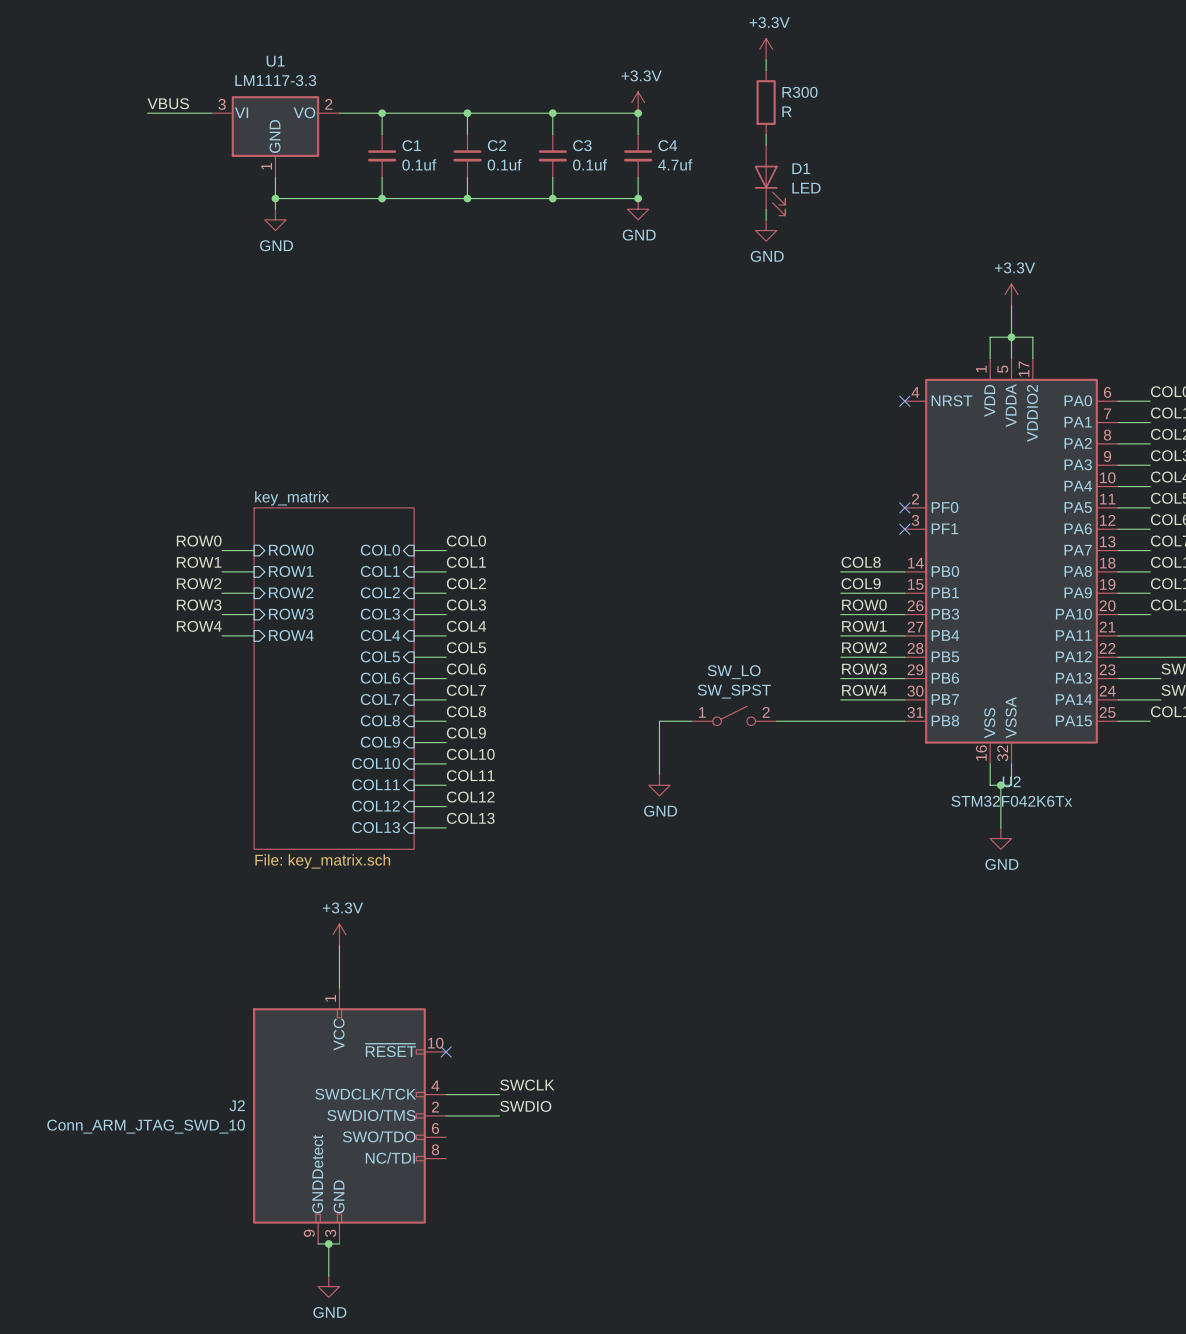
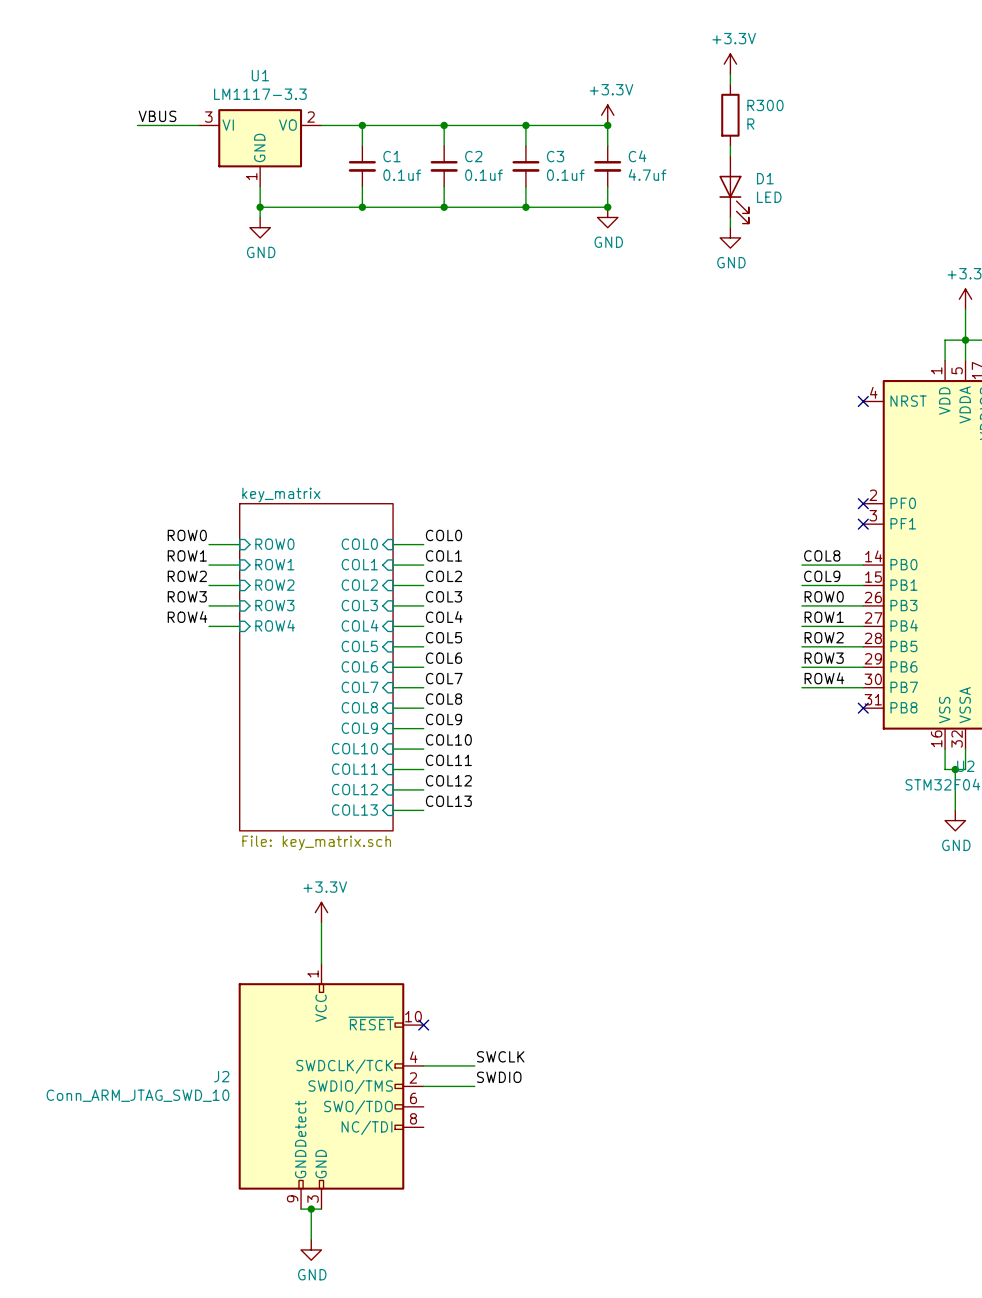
SW_LO: SW_SPST (734, 715) -> none
wire: (691, 721) (659, 721) (659, 774) -> none
wire: (776, 721) (904, 721) -> none
no-connect mark: none -> (863, 708)
power symbol: GND (659, 785) -> none

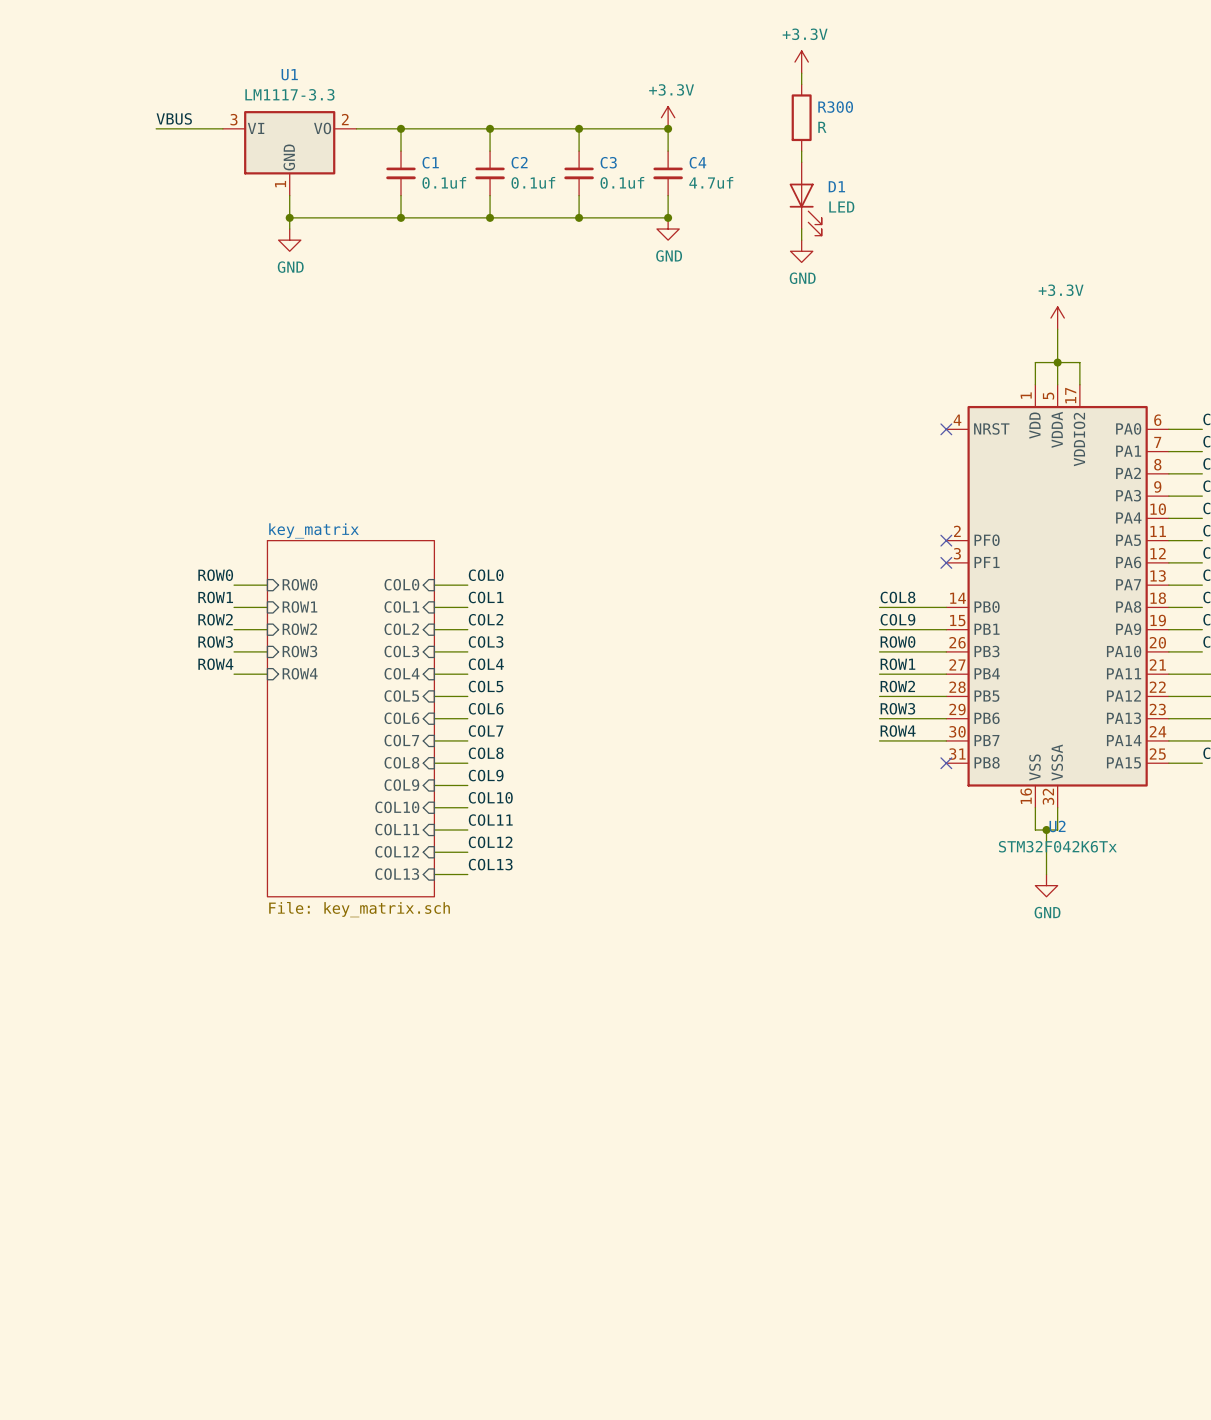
power symbol: +3.3V (321, 912) -> none
wire: (321, 922) (321, 963) -> none
no-connect mark: (423, 1025) -> none
label: SWCLK (500, 1056) -> none
wire: (423, 1065) (474, 1065) -> none
label: SWDIO (499, 1077) -> none
J2: Conn_ARM_JTAG_SWD_10 (331, 1086) -> none
wire: (423, 1086) (474, 1086) -> none
wire: (301, 1209) (321, 1209) -> none
wire: (311, 1209) (311, 1239) -> none
junction: (311, 1209) -> none
power symbol: GND (311, 1249) -> none

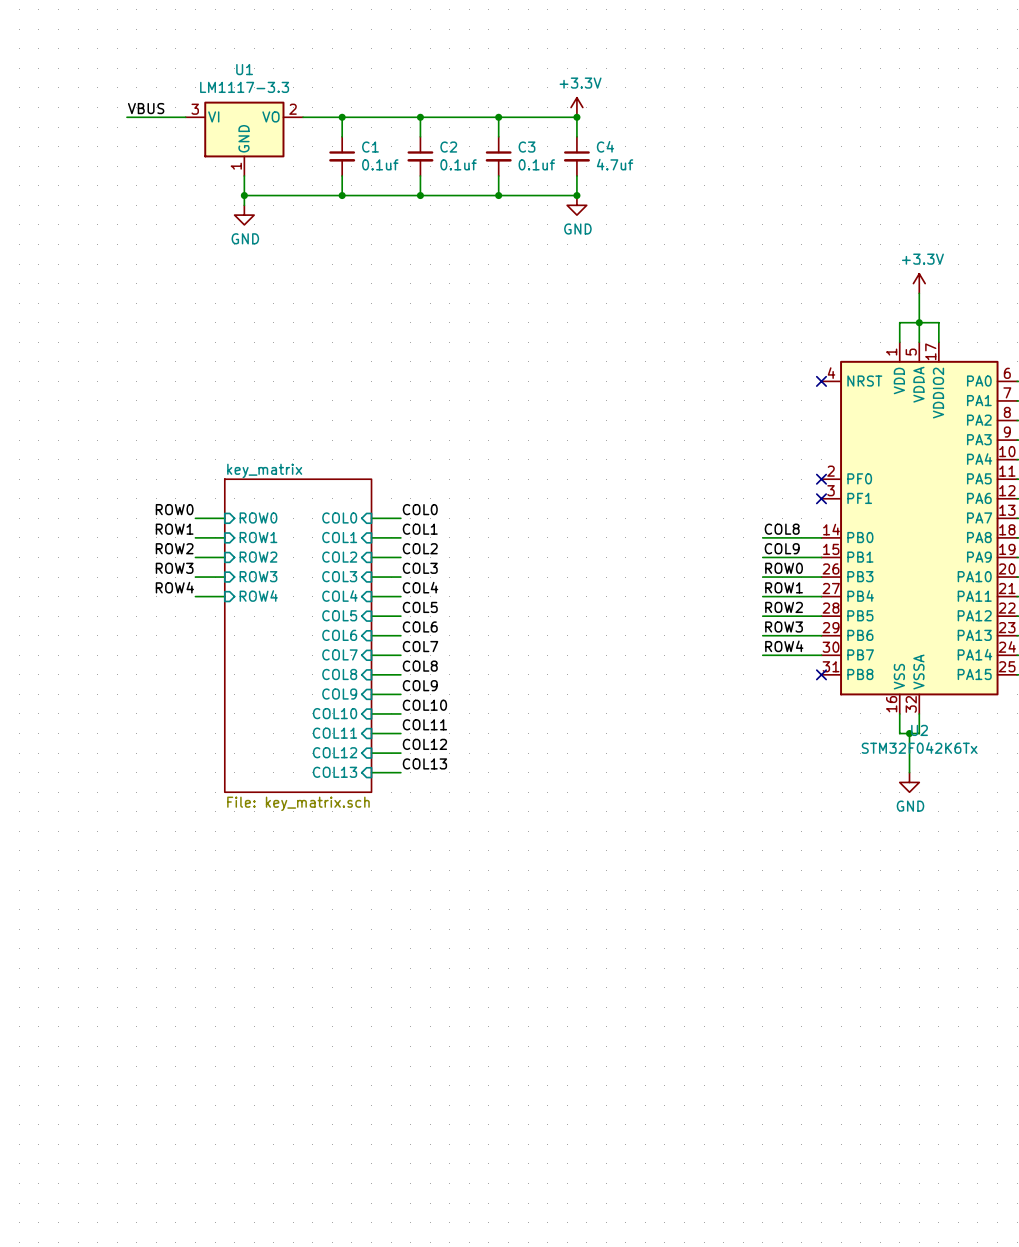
power symbol: +3.3V (801, 62) -> none
wire: (801, 73) (801, 84) -> none
R300: R (801, 117) -> none
wire: (801, 151) (801, 162) -> none
D1: LED (805, 198) -> none
wire: (801, 229) (801, 240) -> none
power symbol: GND (801, 251) -> none

